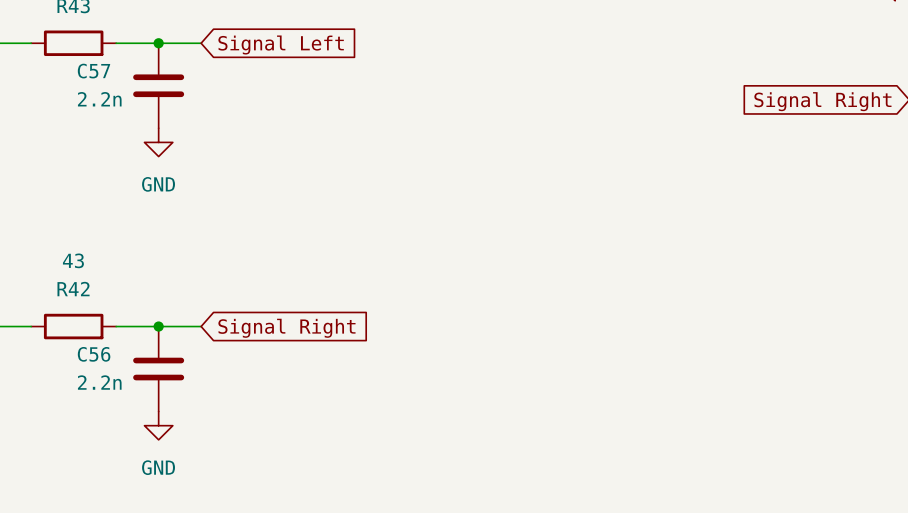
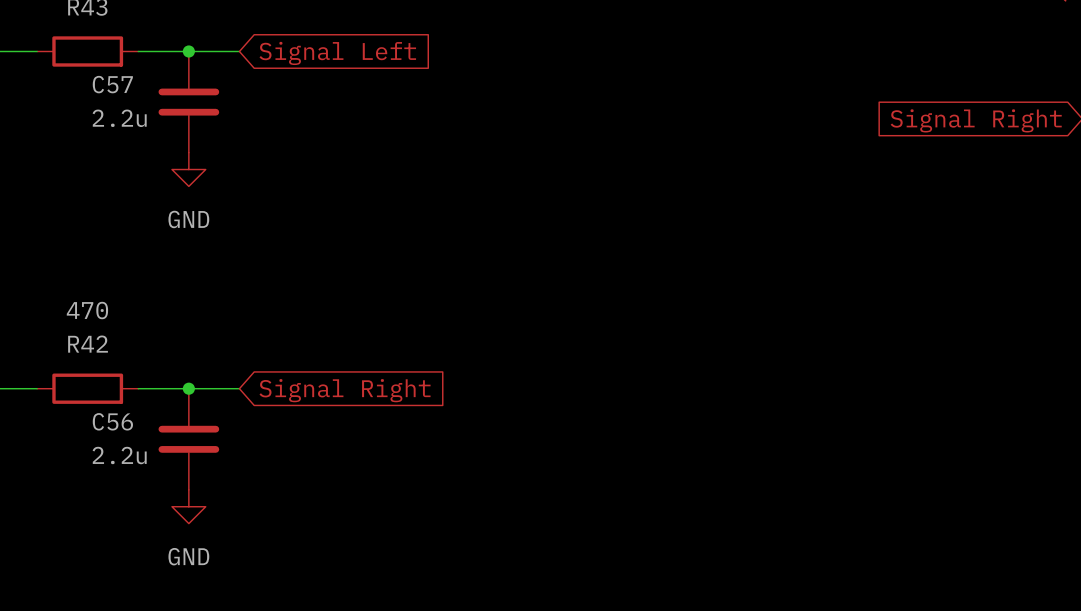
C57 value: 2.2n (99, 99) -> 2.2u (119, 118)
R42 value: 43 (73, 260) -> 470 (87, 310)
C56 value: 2.2n (99, 382) -> 2.2u (119, 455)

